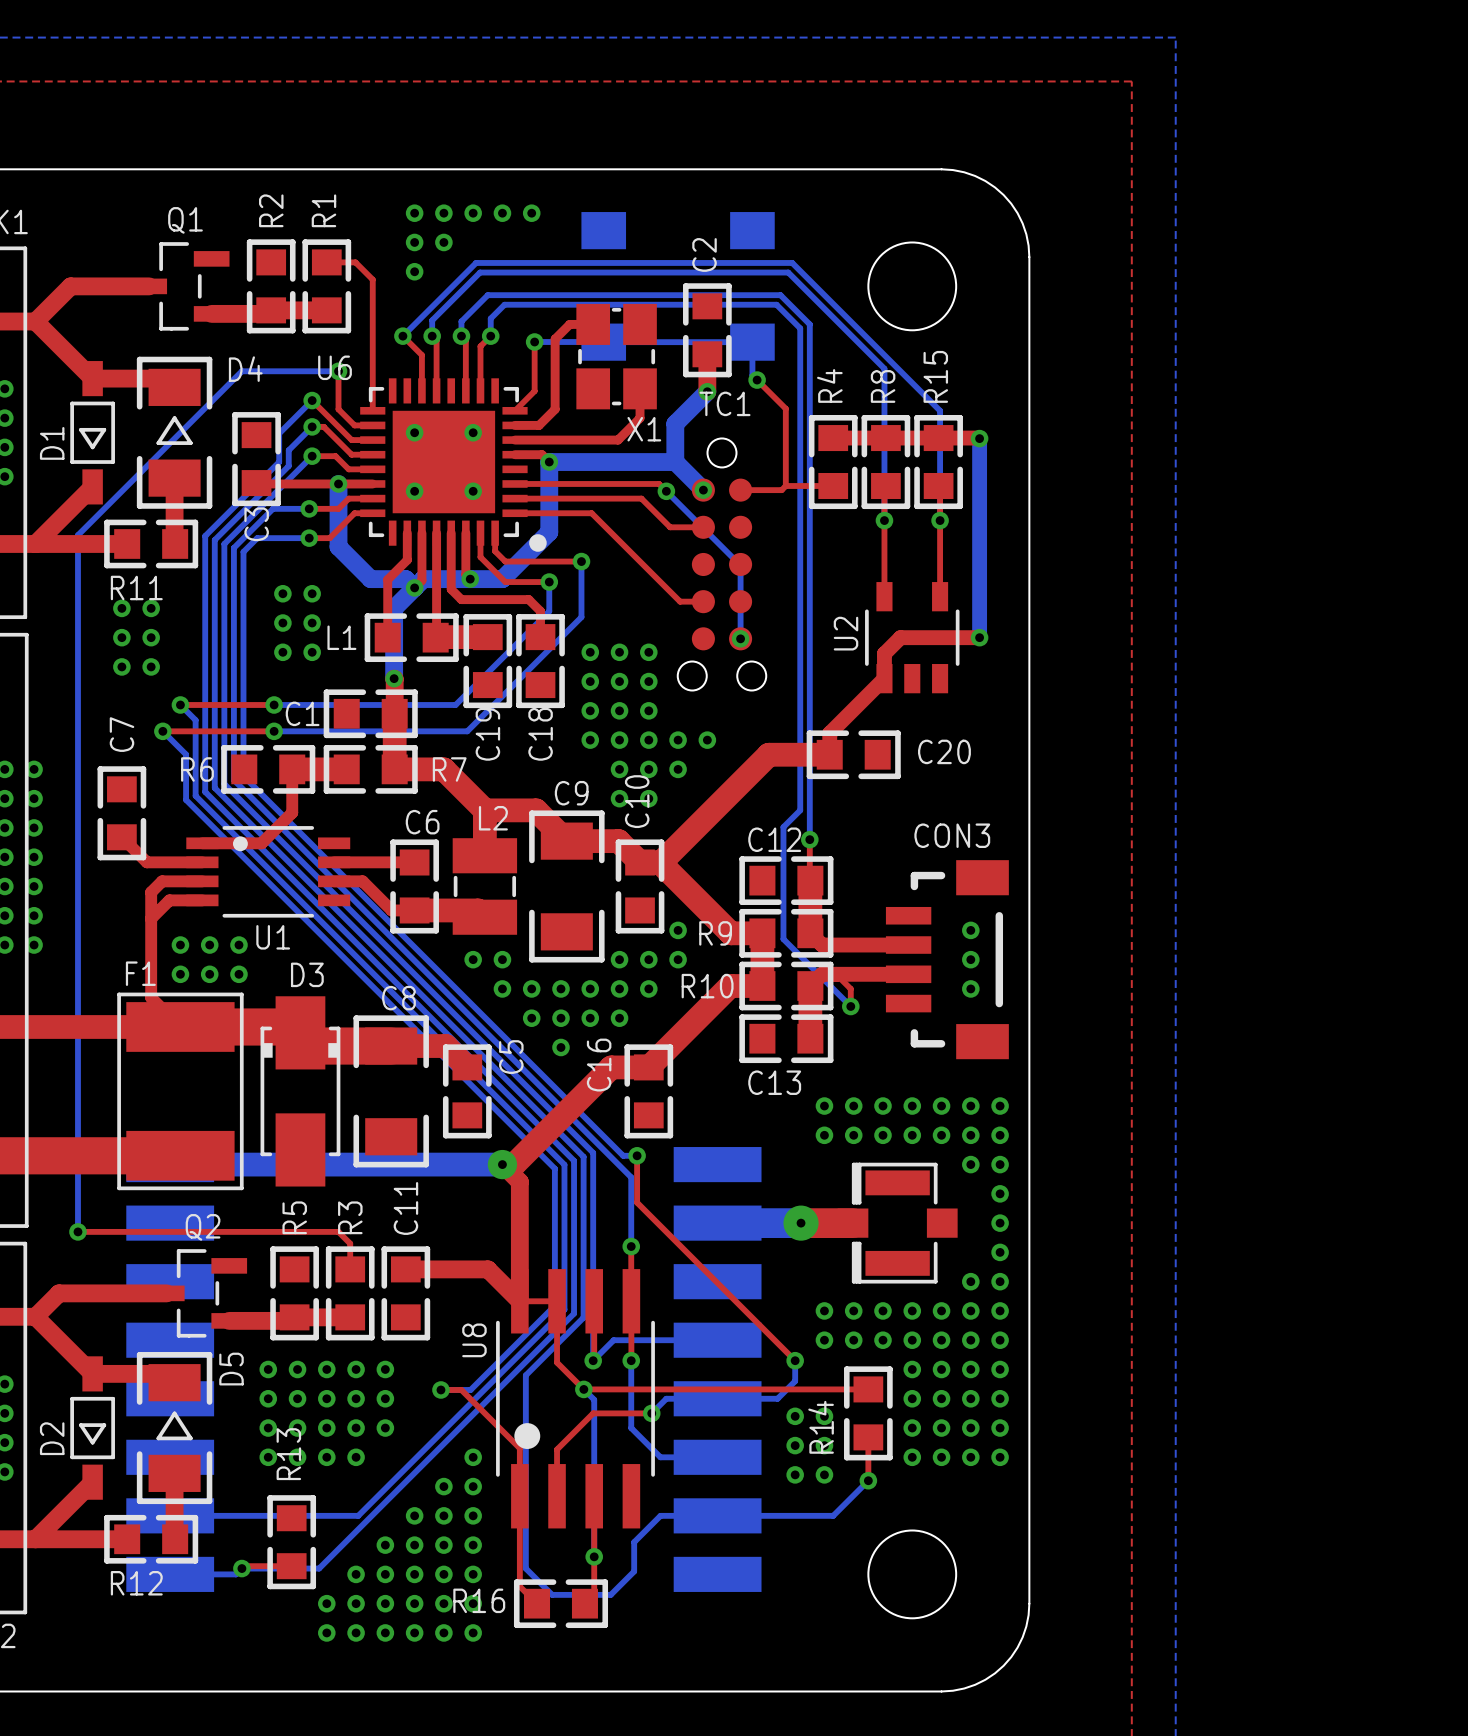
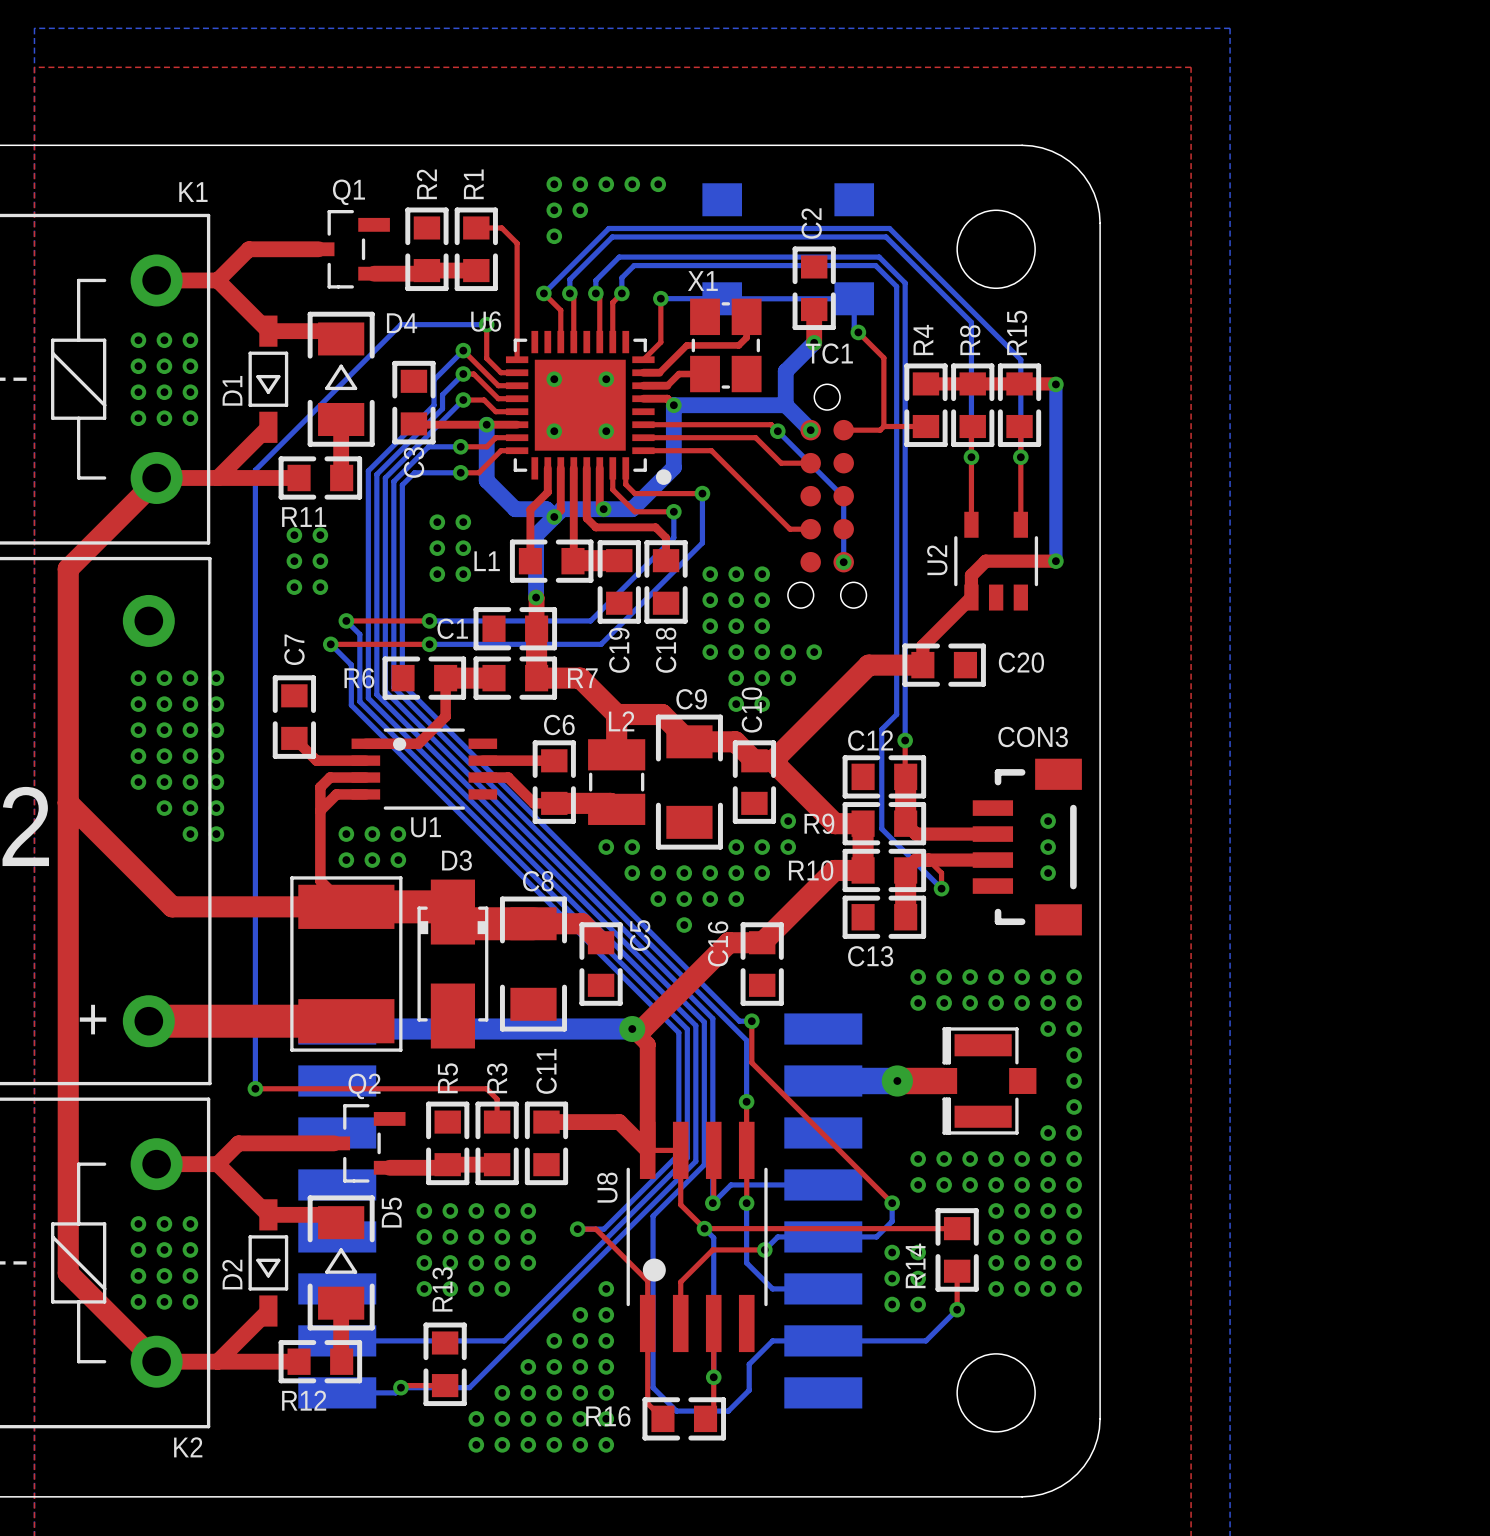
top track: (593, 324) (569, 324) (555, 339) (555, 409) (539, 425) (533, 425) -> (746, 316) (746, 337) (738, 345) (686, 345) (659, 372)
X1 position: (616, 356) -> (725, 345)
top track: (640, 388) (640, 418) (618, 440) (541, 440) -> (705, 374) (679, 374) (667, 385)
X1 name position: X1 (644, 429) -> X1 (702, 281)
F1 name: F1 (140, 973) -> none

